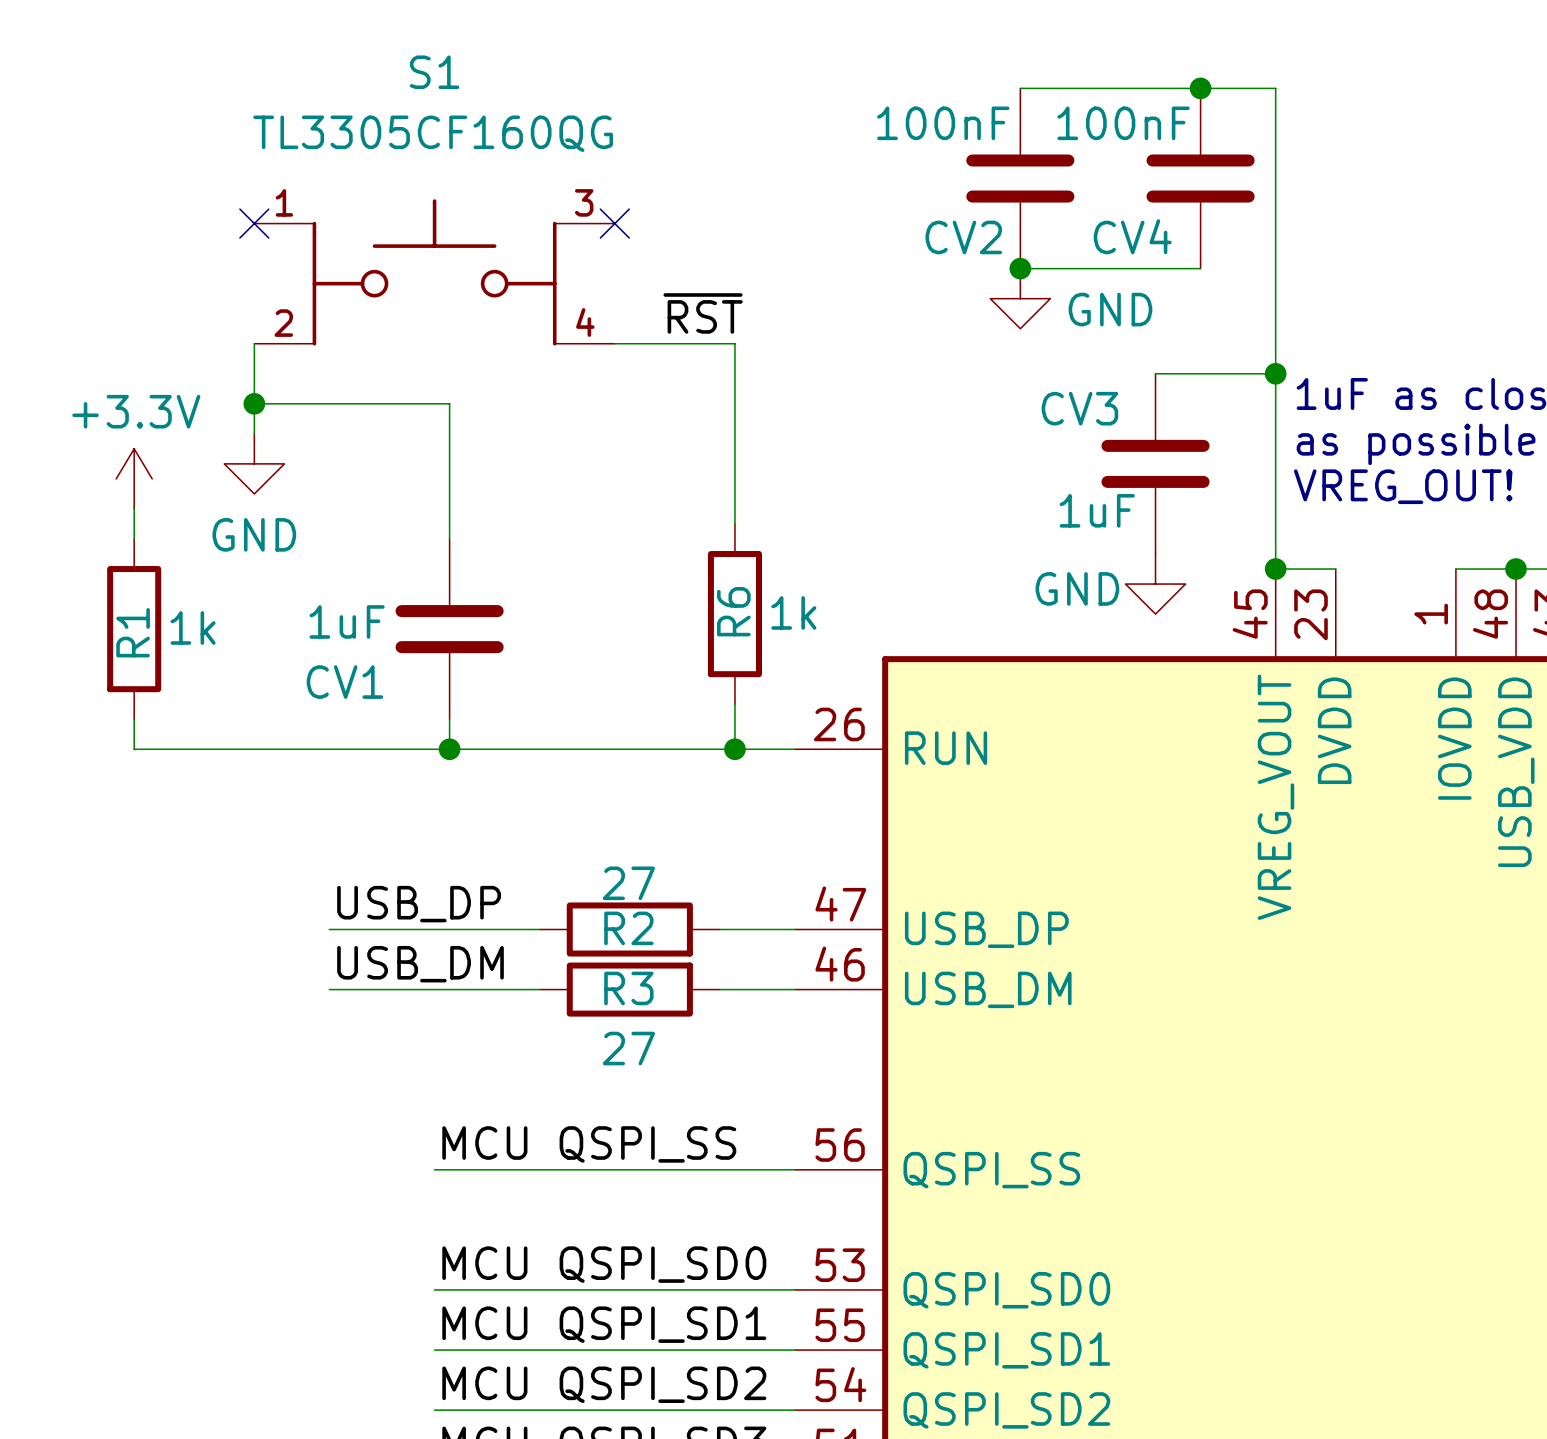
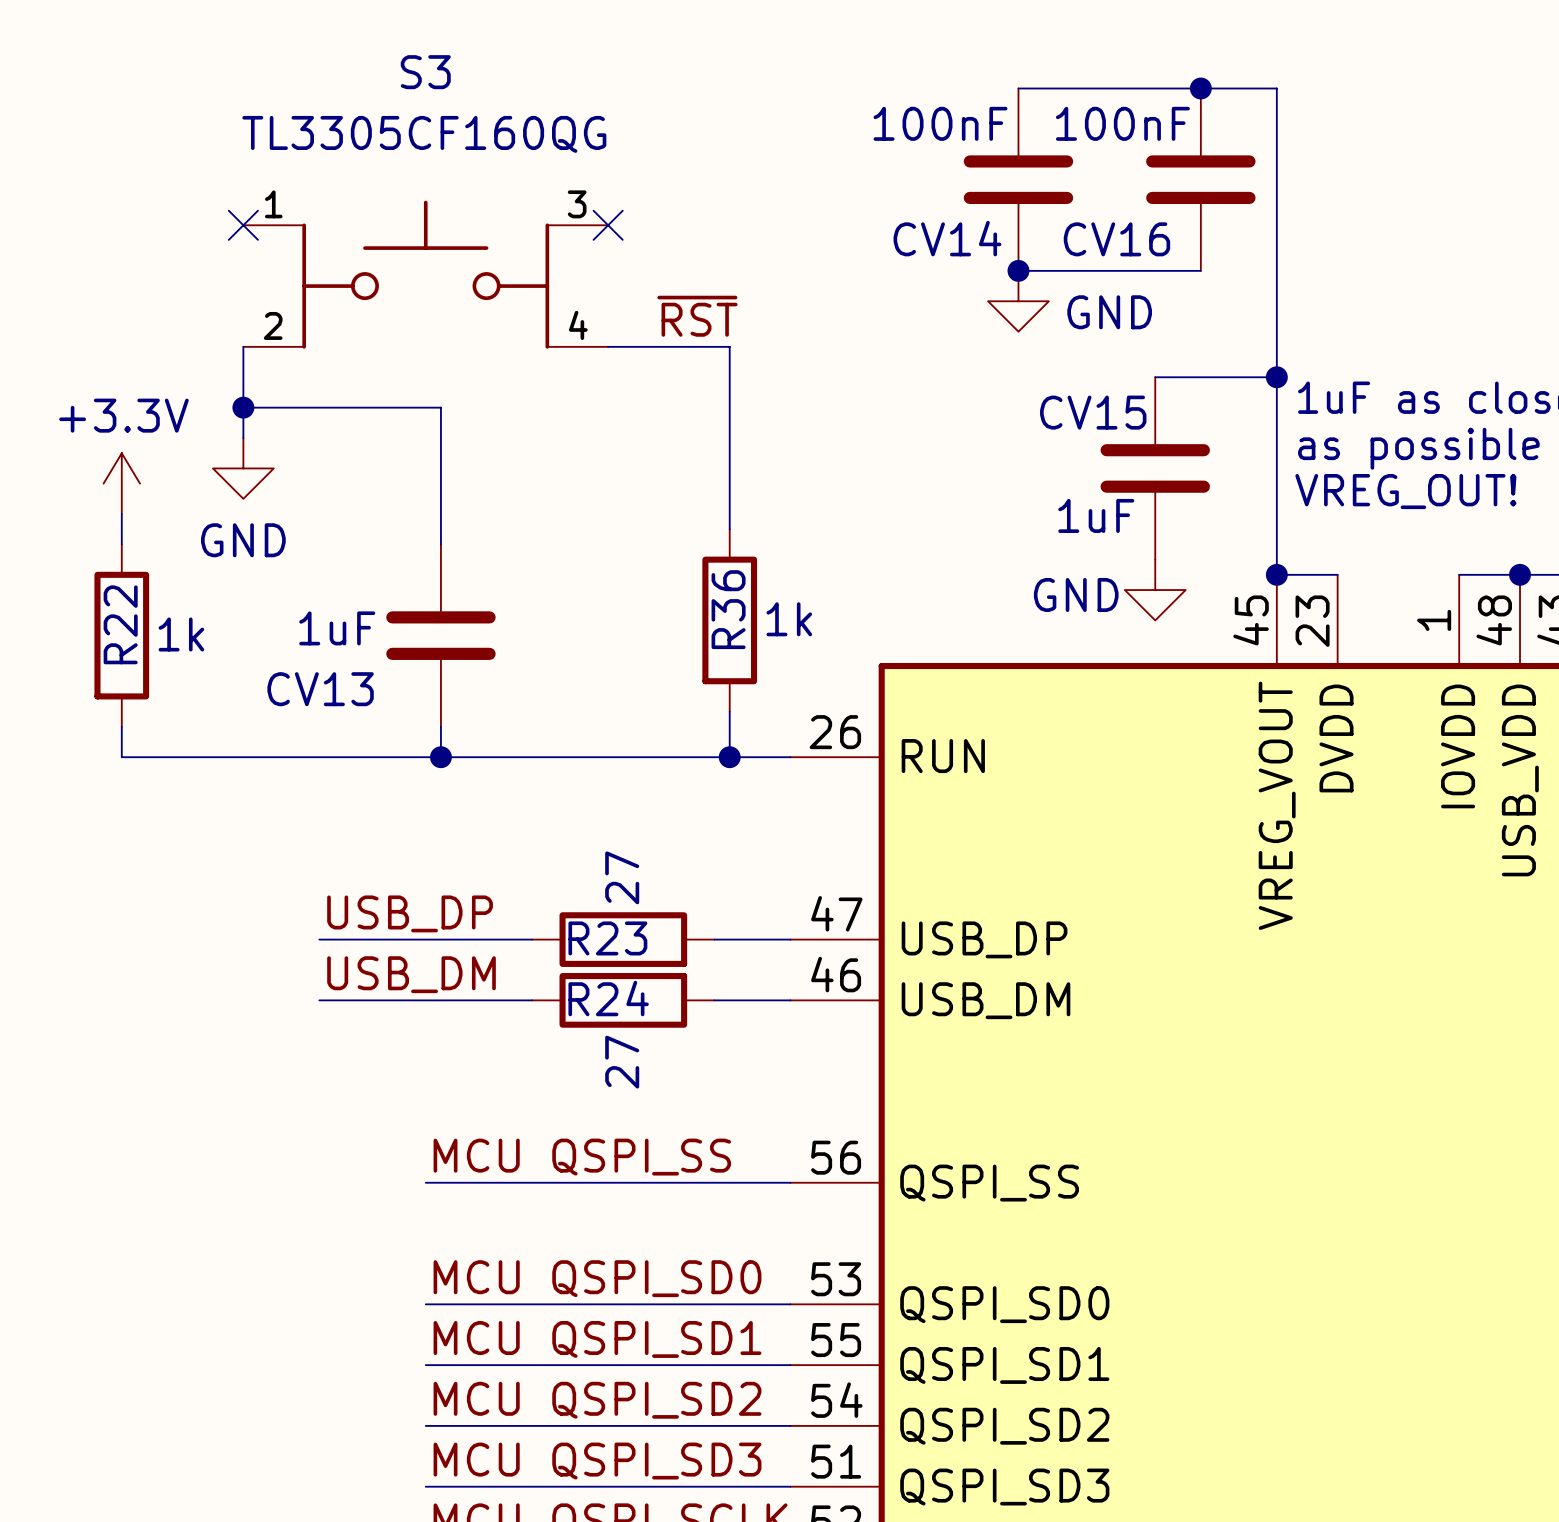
S1 name: S1 (434, 72) -> S3 (425, 72)
CV4 name: CV4 (1132, 236) -> CV16 (1116, 239)
CV2 name: CV2 (963, 237) -> CV14 (947, 238)
CV3 name: CV3 (1079, 408) -> CV15 (1093, 412)
R6 name: R6 (733, 611) -> R36 (728, 609)
R1 name: R1 (133, 632) -> R22 (120, 624)
CV1 name: CV1 (344, 682) -> CV13 (320, 689)
R2 value rotation: 0° (628, 883) -> 90° counterclockwise (622, 877)
R2 name: R2 (628, 928) -> R23 (607, 938)
R3 name: R3 (628, 988) -> R24 (608, 998)
R3 value rotation: 0° (628, 1048) -> 90° counterclockwise (622, 1062)

